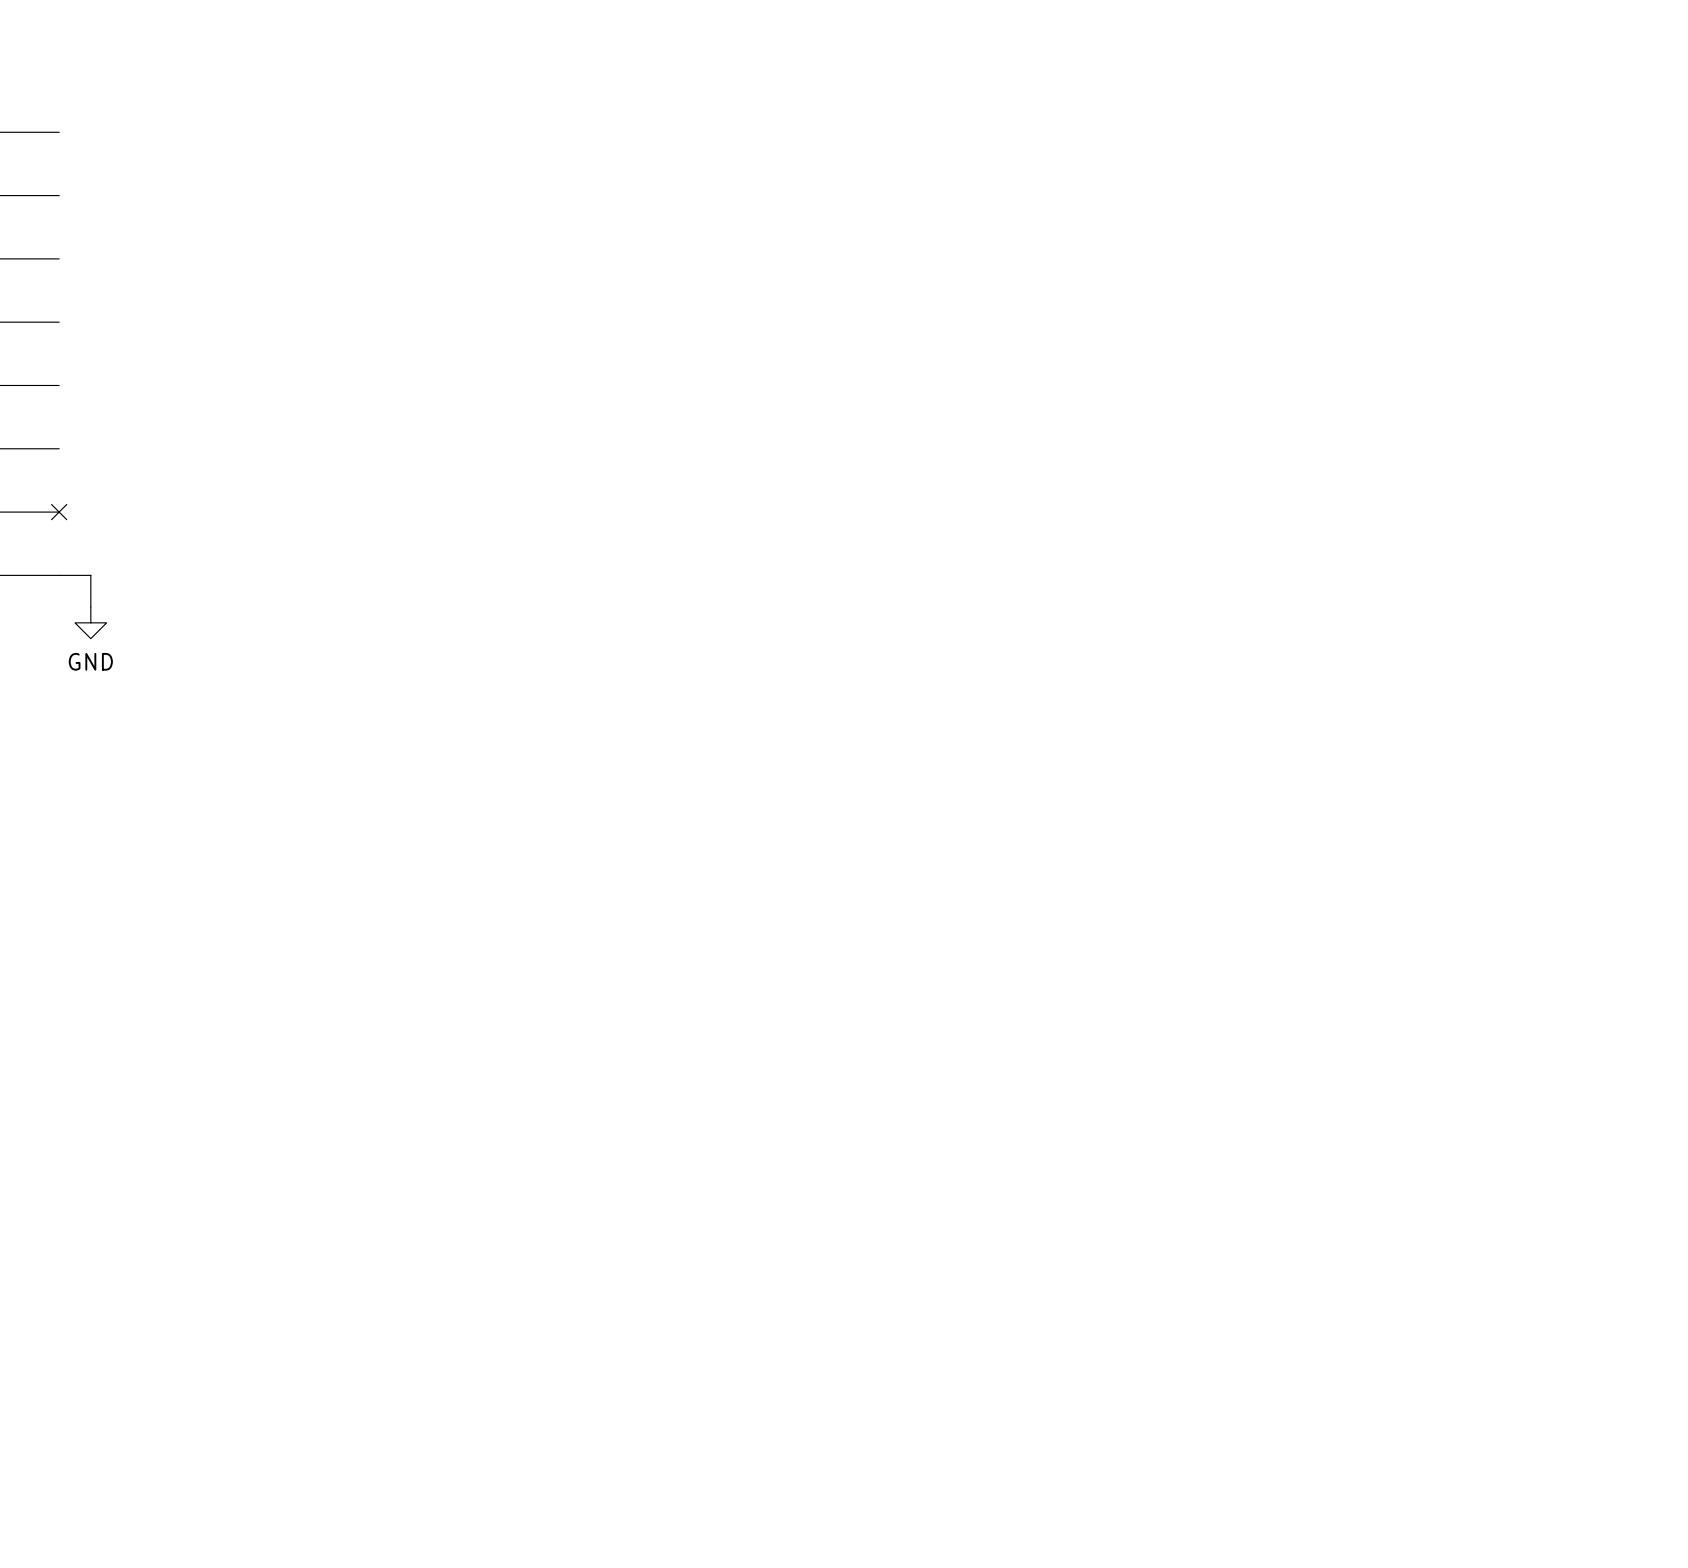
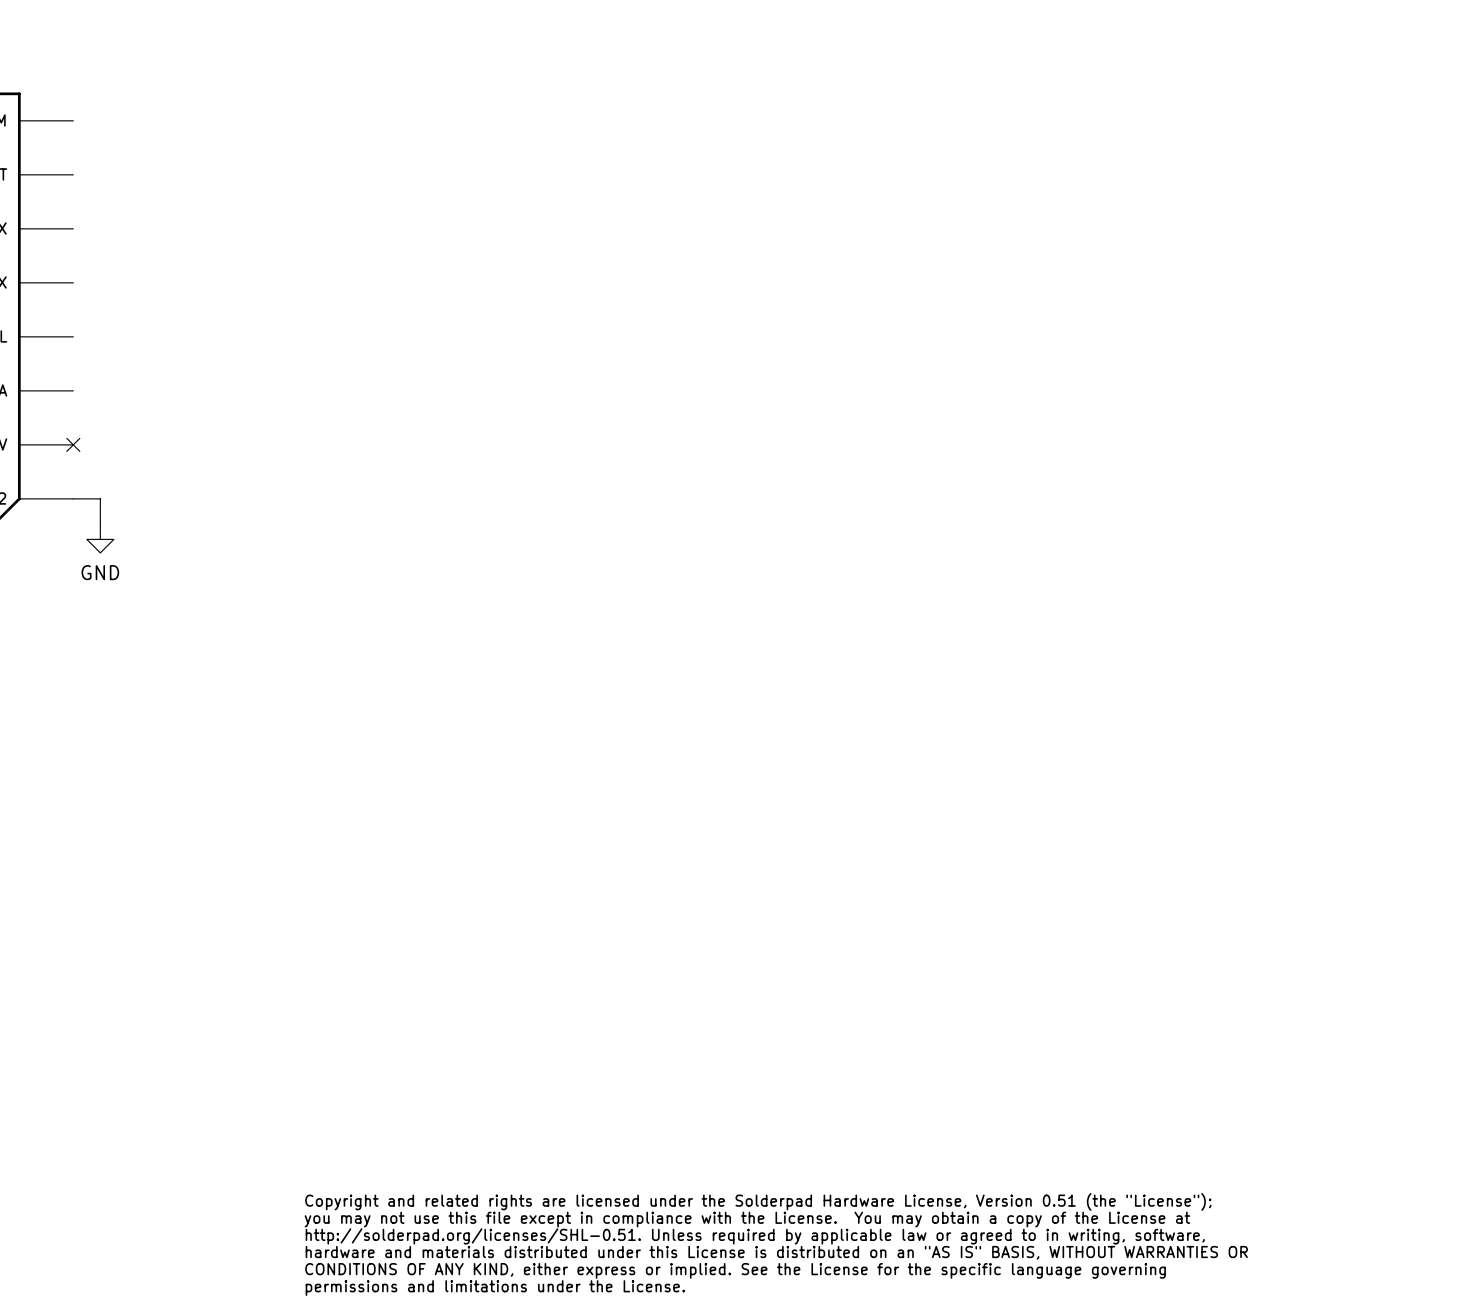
text: none -> Copyright and related rights are licensed under the Solderpad Hardware License, Version 0.51 (the "License"); (758, 1201)
text: none -> you may not use this file except in compliance with the License. You may obtain a copy of the License at (747, 1219)
text: none -> http://solderpad.org/licenses/SHL-0.51. Unless required by applicable law or agreed to in writing, software, (755, 1236)
text: none -> hardware and materials distributed under this License is distributed on an "AS IS" BASIS, WITHOUT WARRANTIES OR (776, 1252)
text: none -> CONDITIONS OF ANY KIND, either express or implied. See the License for the specific language governing (735, 1270)
text: none -> permissions and limitations under the License. (495, 1288)

